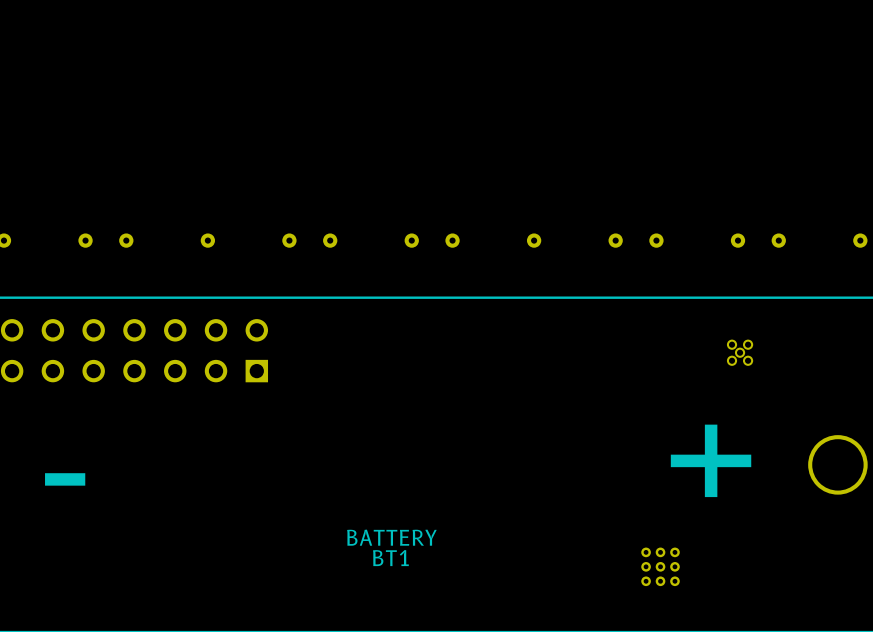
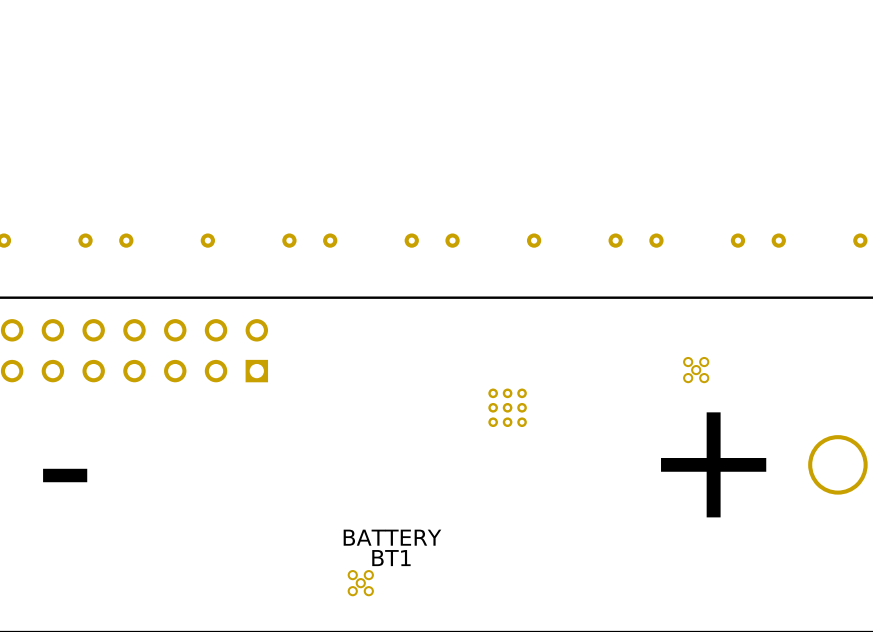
part position: (740, 352) -> (696, 370)
part position: (660, 566) -> (507, 407)
part: none -> (360, 583)

